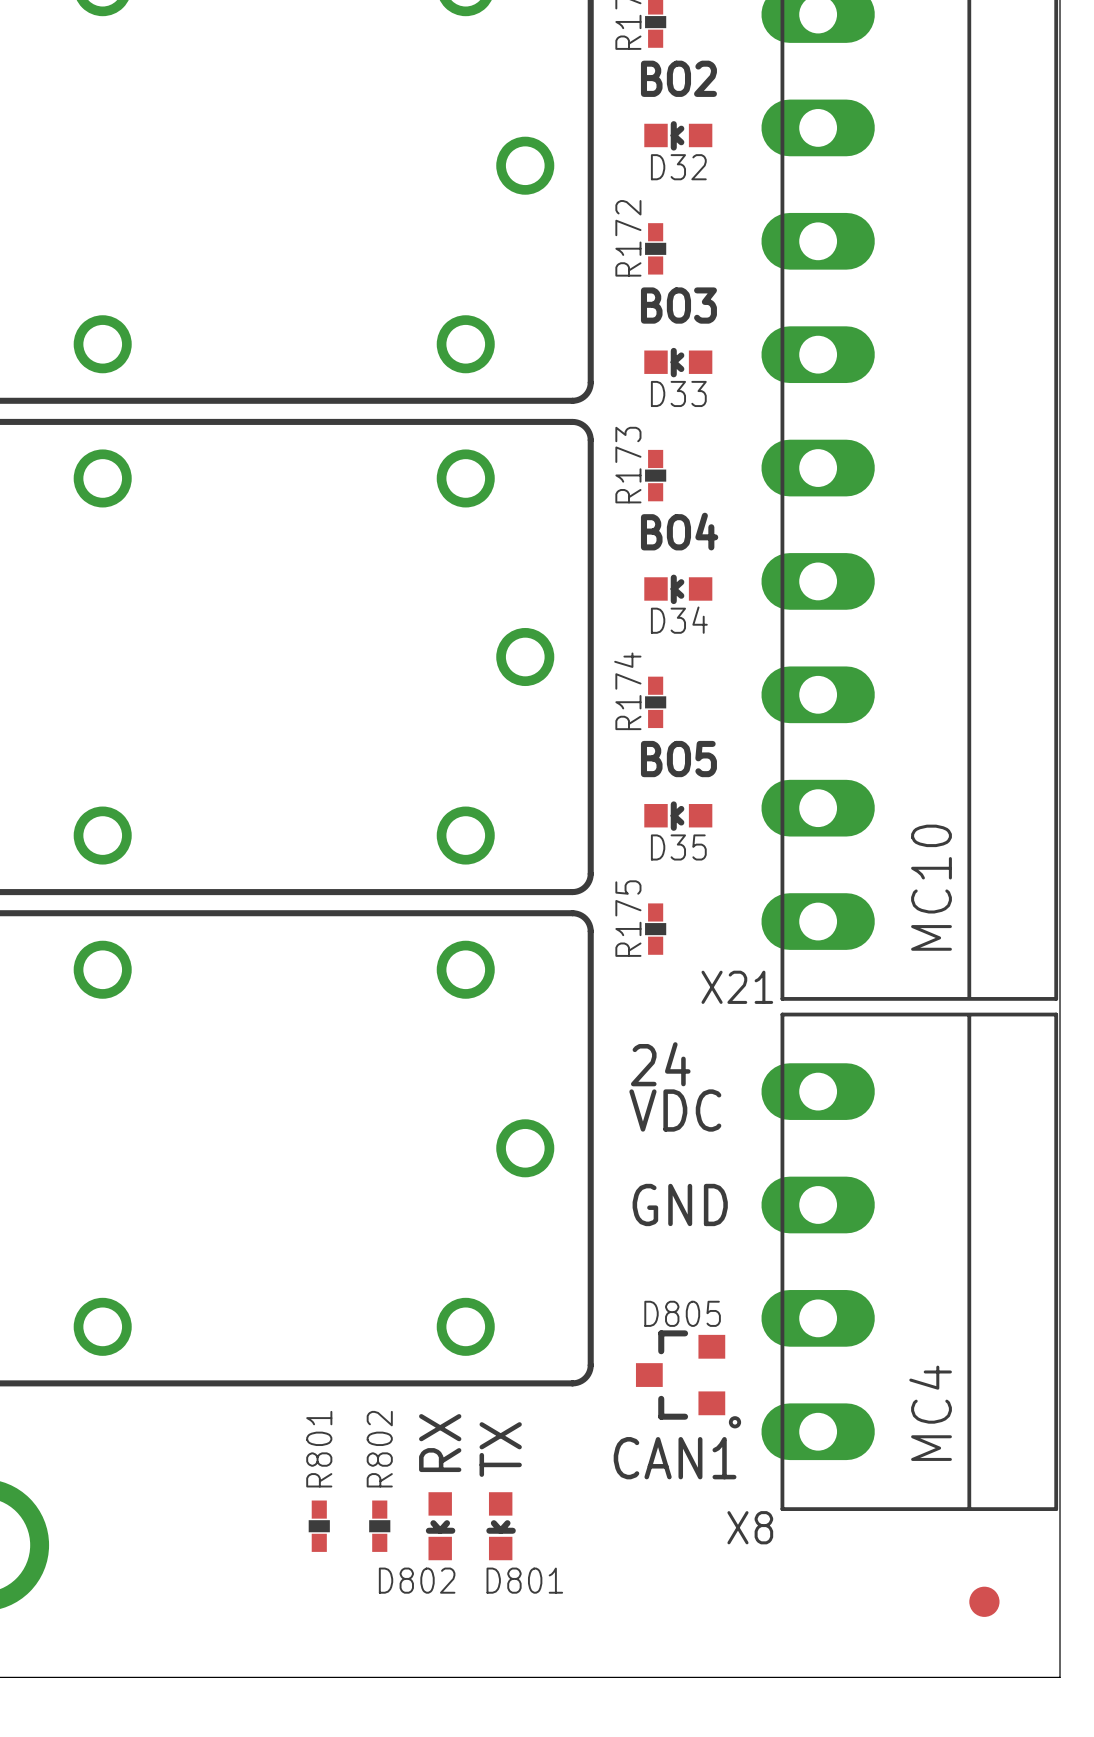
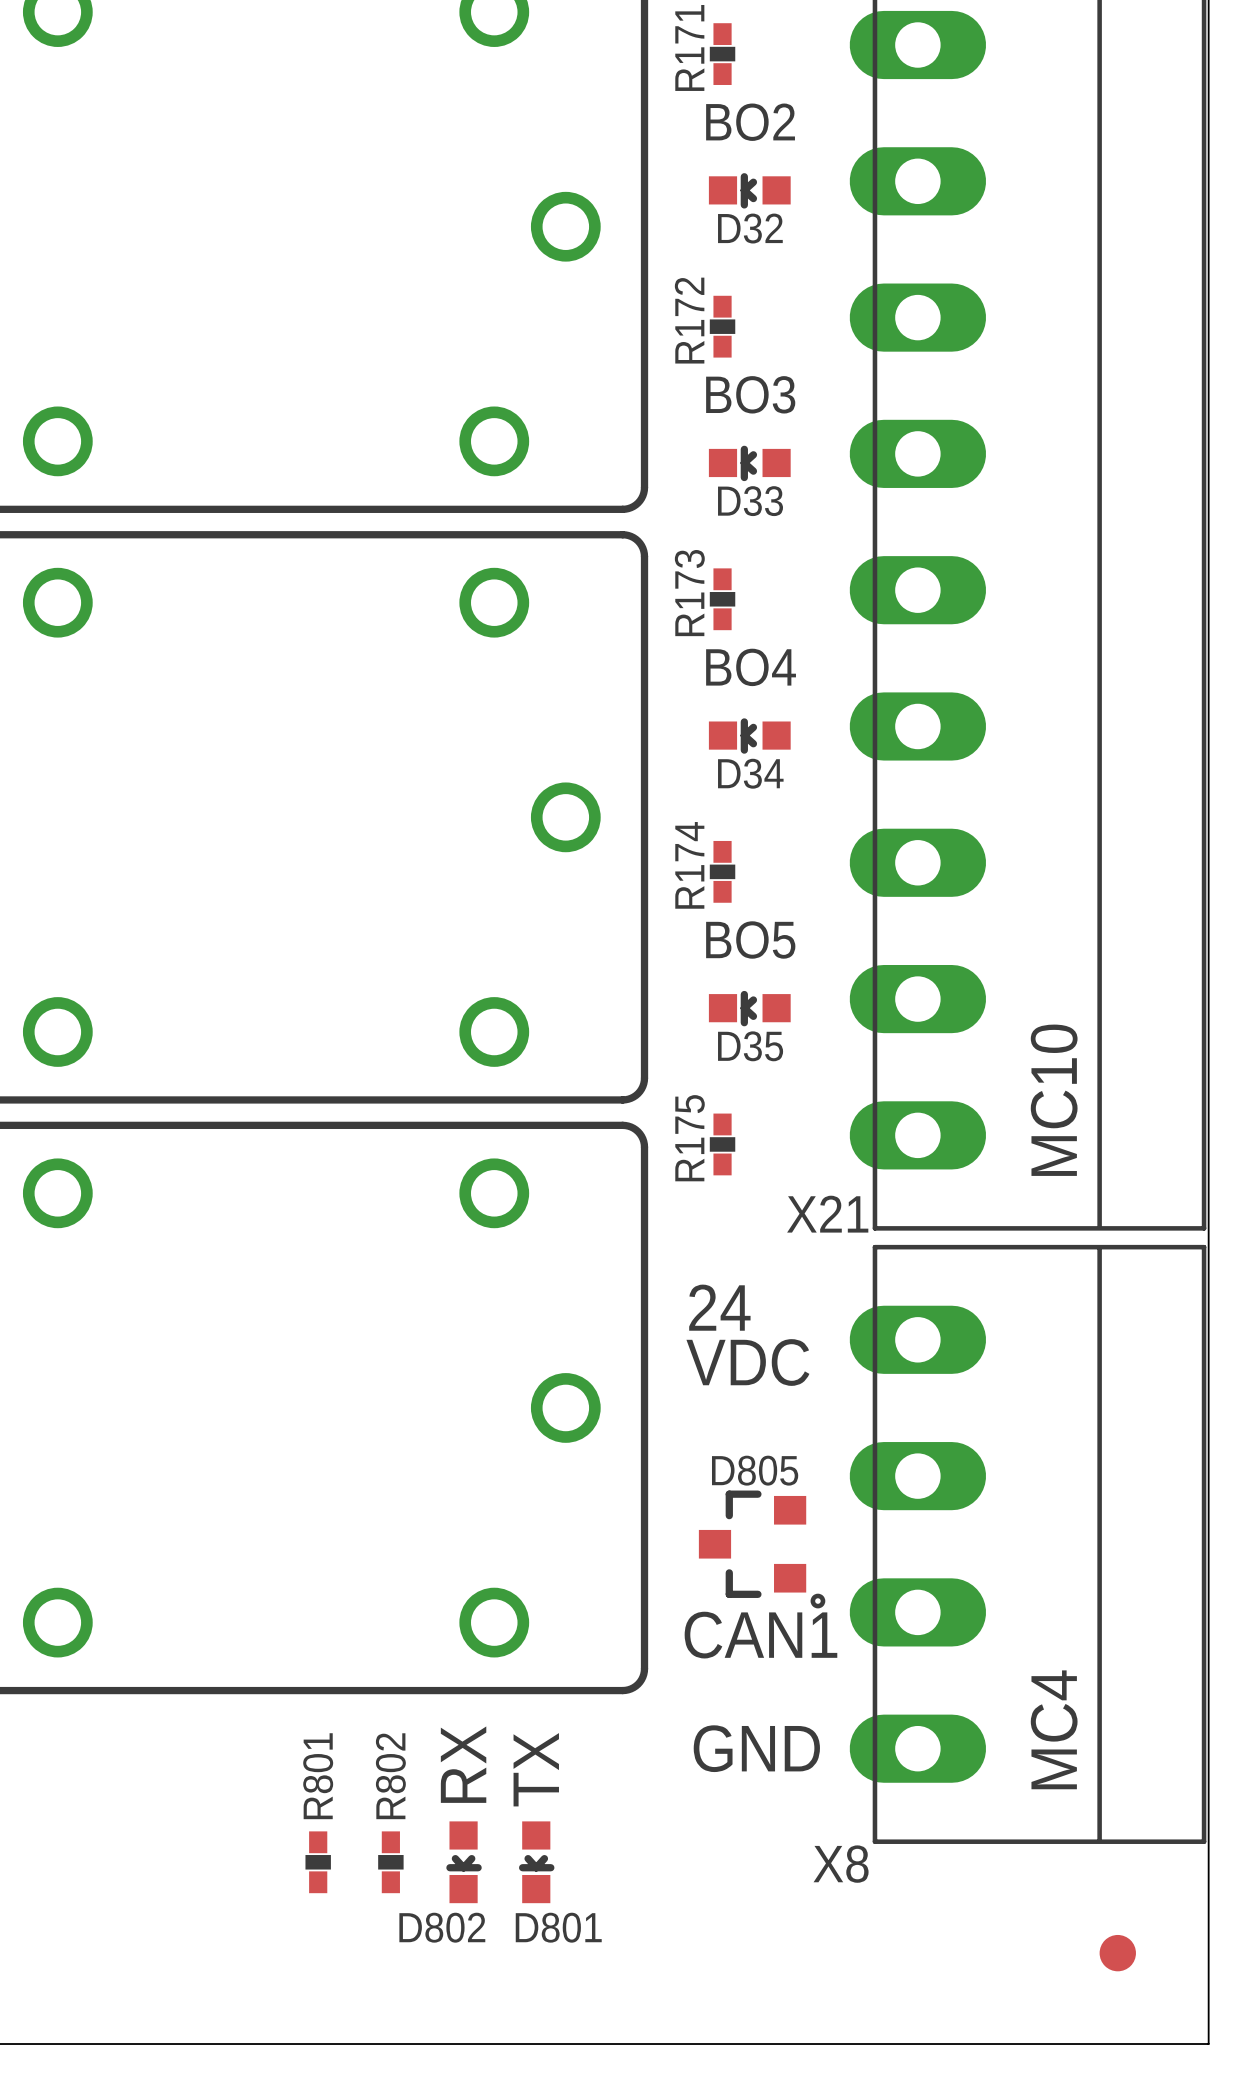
text position: GND (680, 1204) -> GND (756, 1748)
D805 position: (688, 1379) -> (762, 1549)
text position: CAN1 (675, 1458) -> CAN1 (760, 1635)

